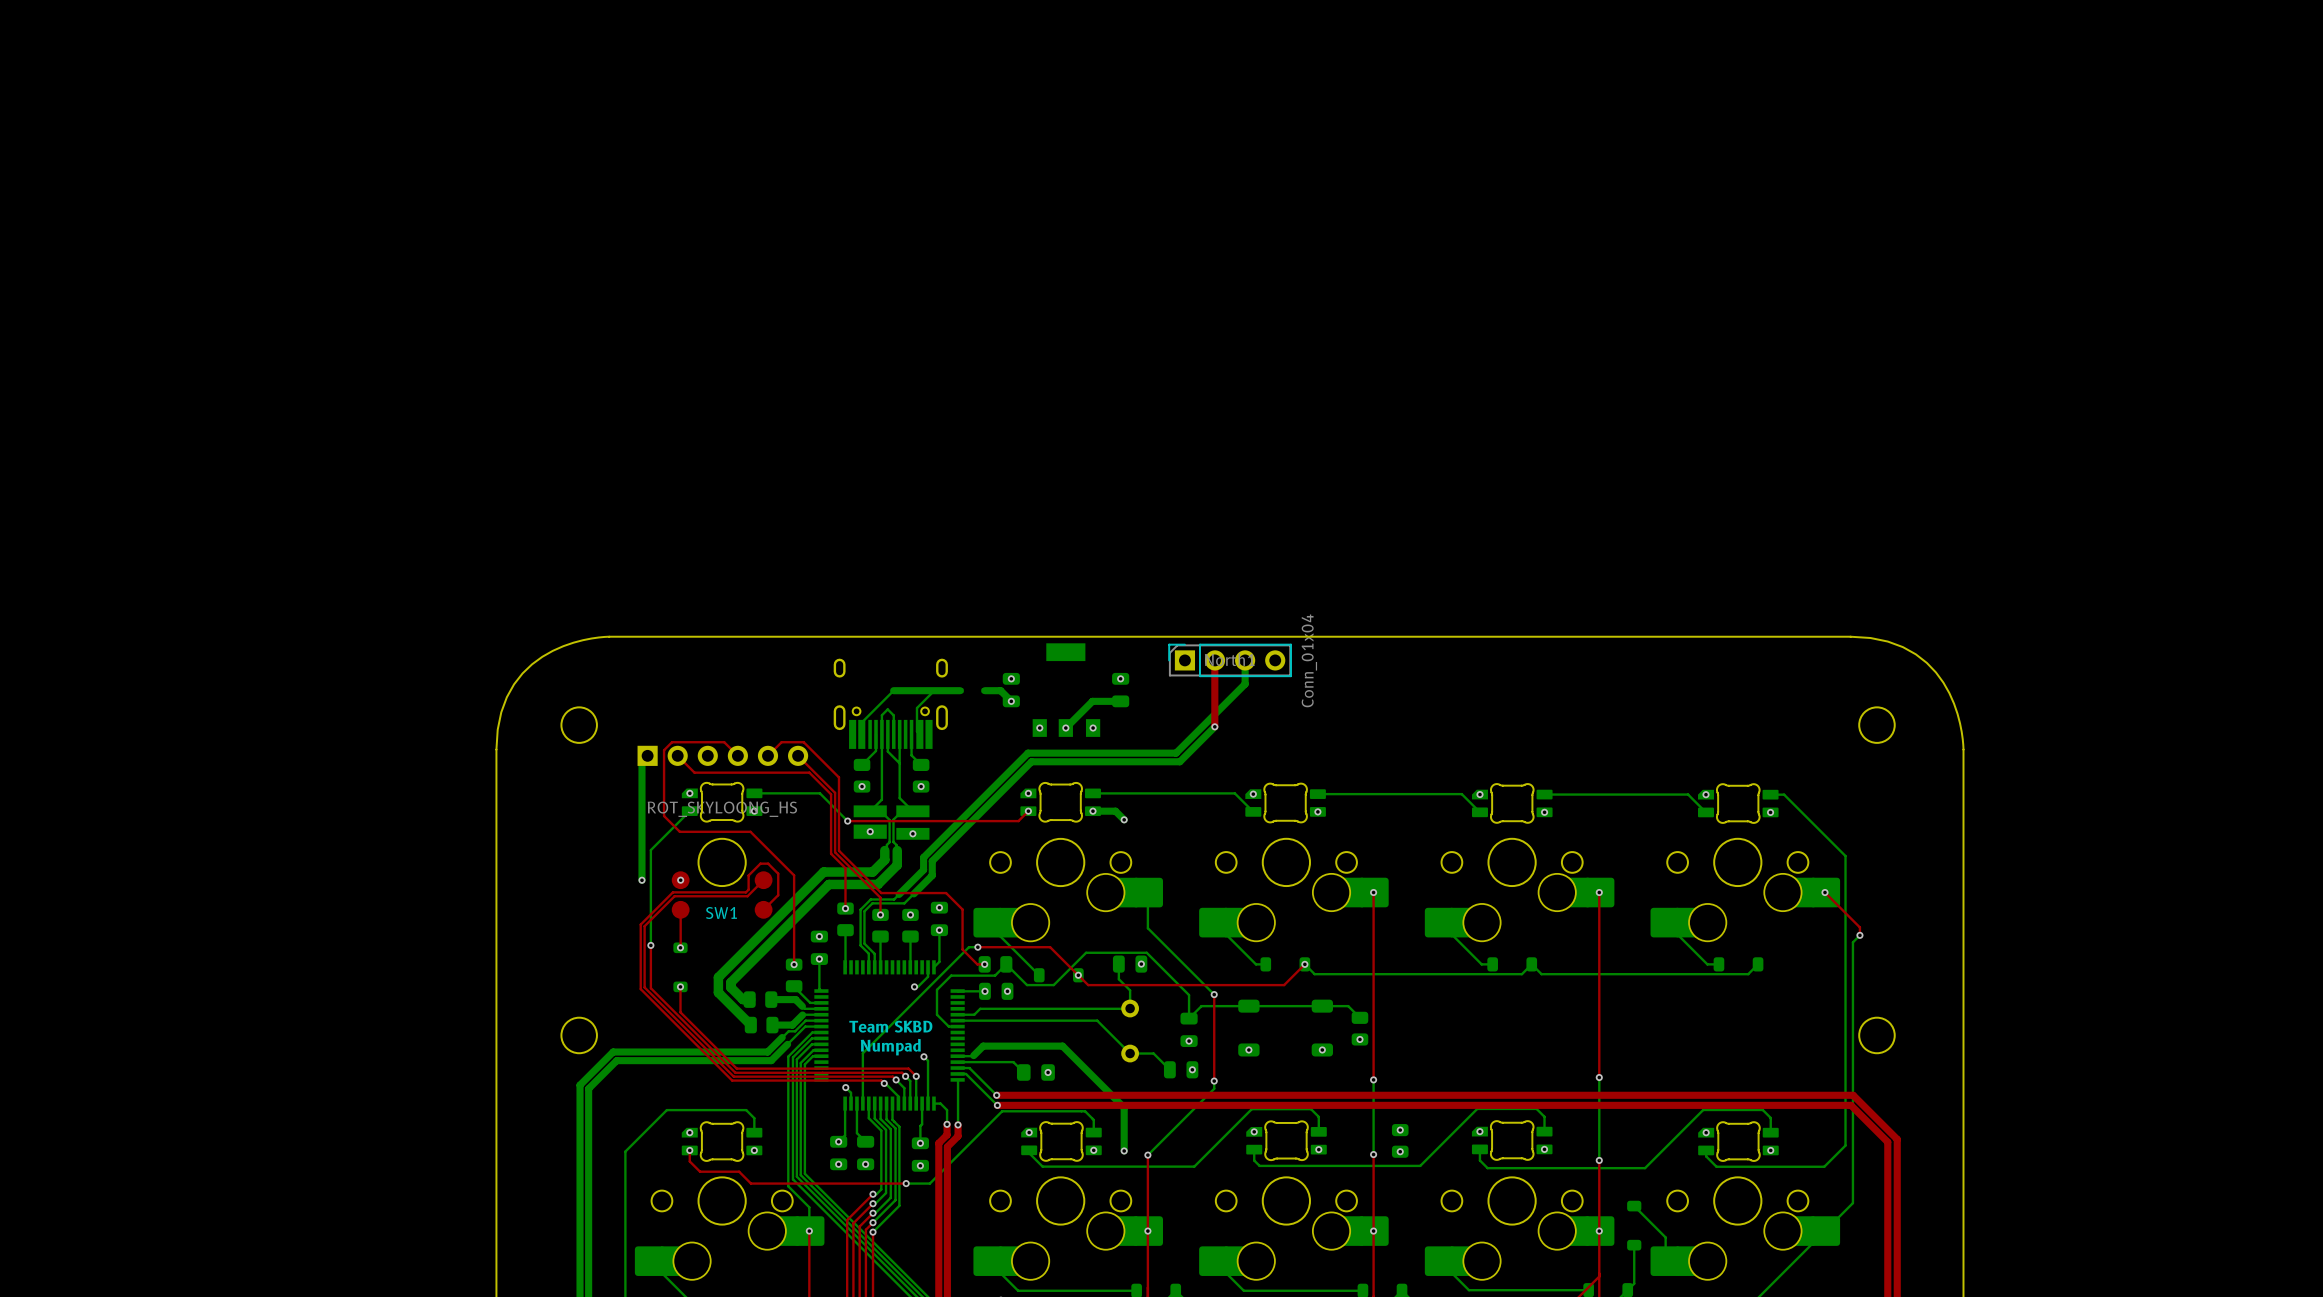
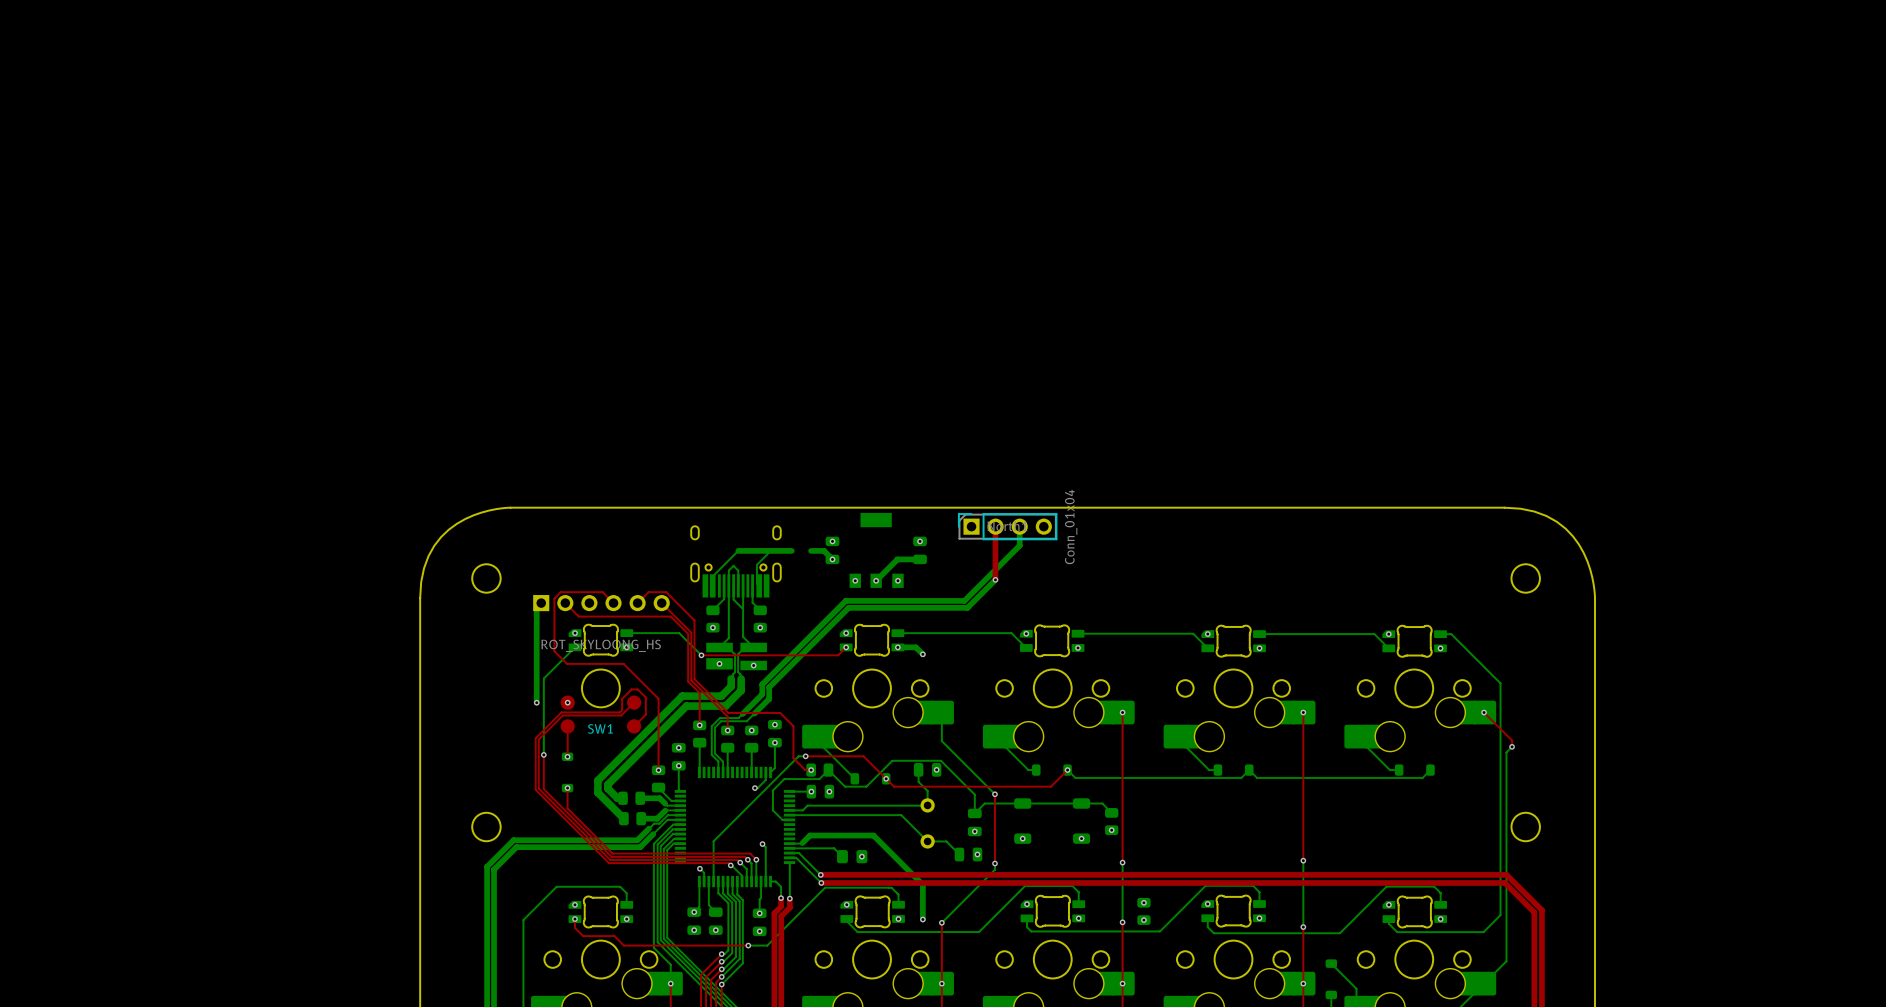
text: Team SKBD (890, 1026) -> none
text: Numpad (890, 1047) -> none

